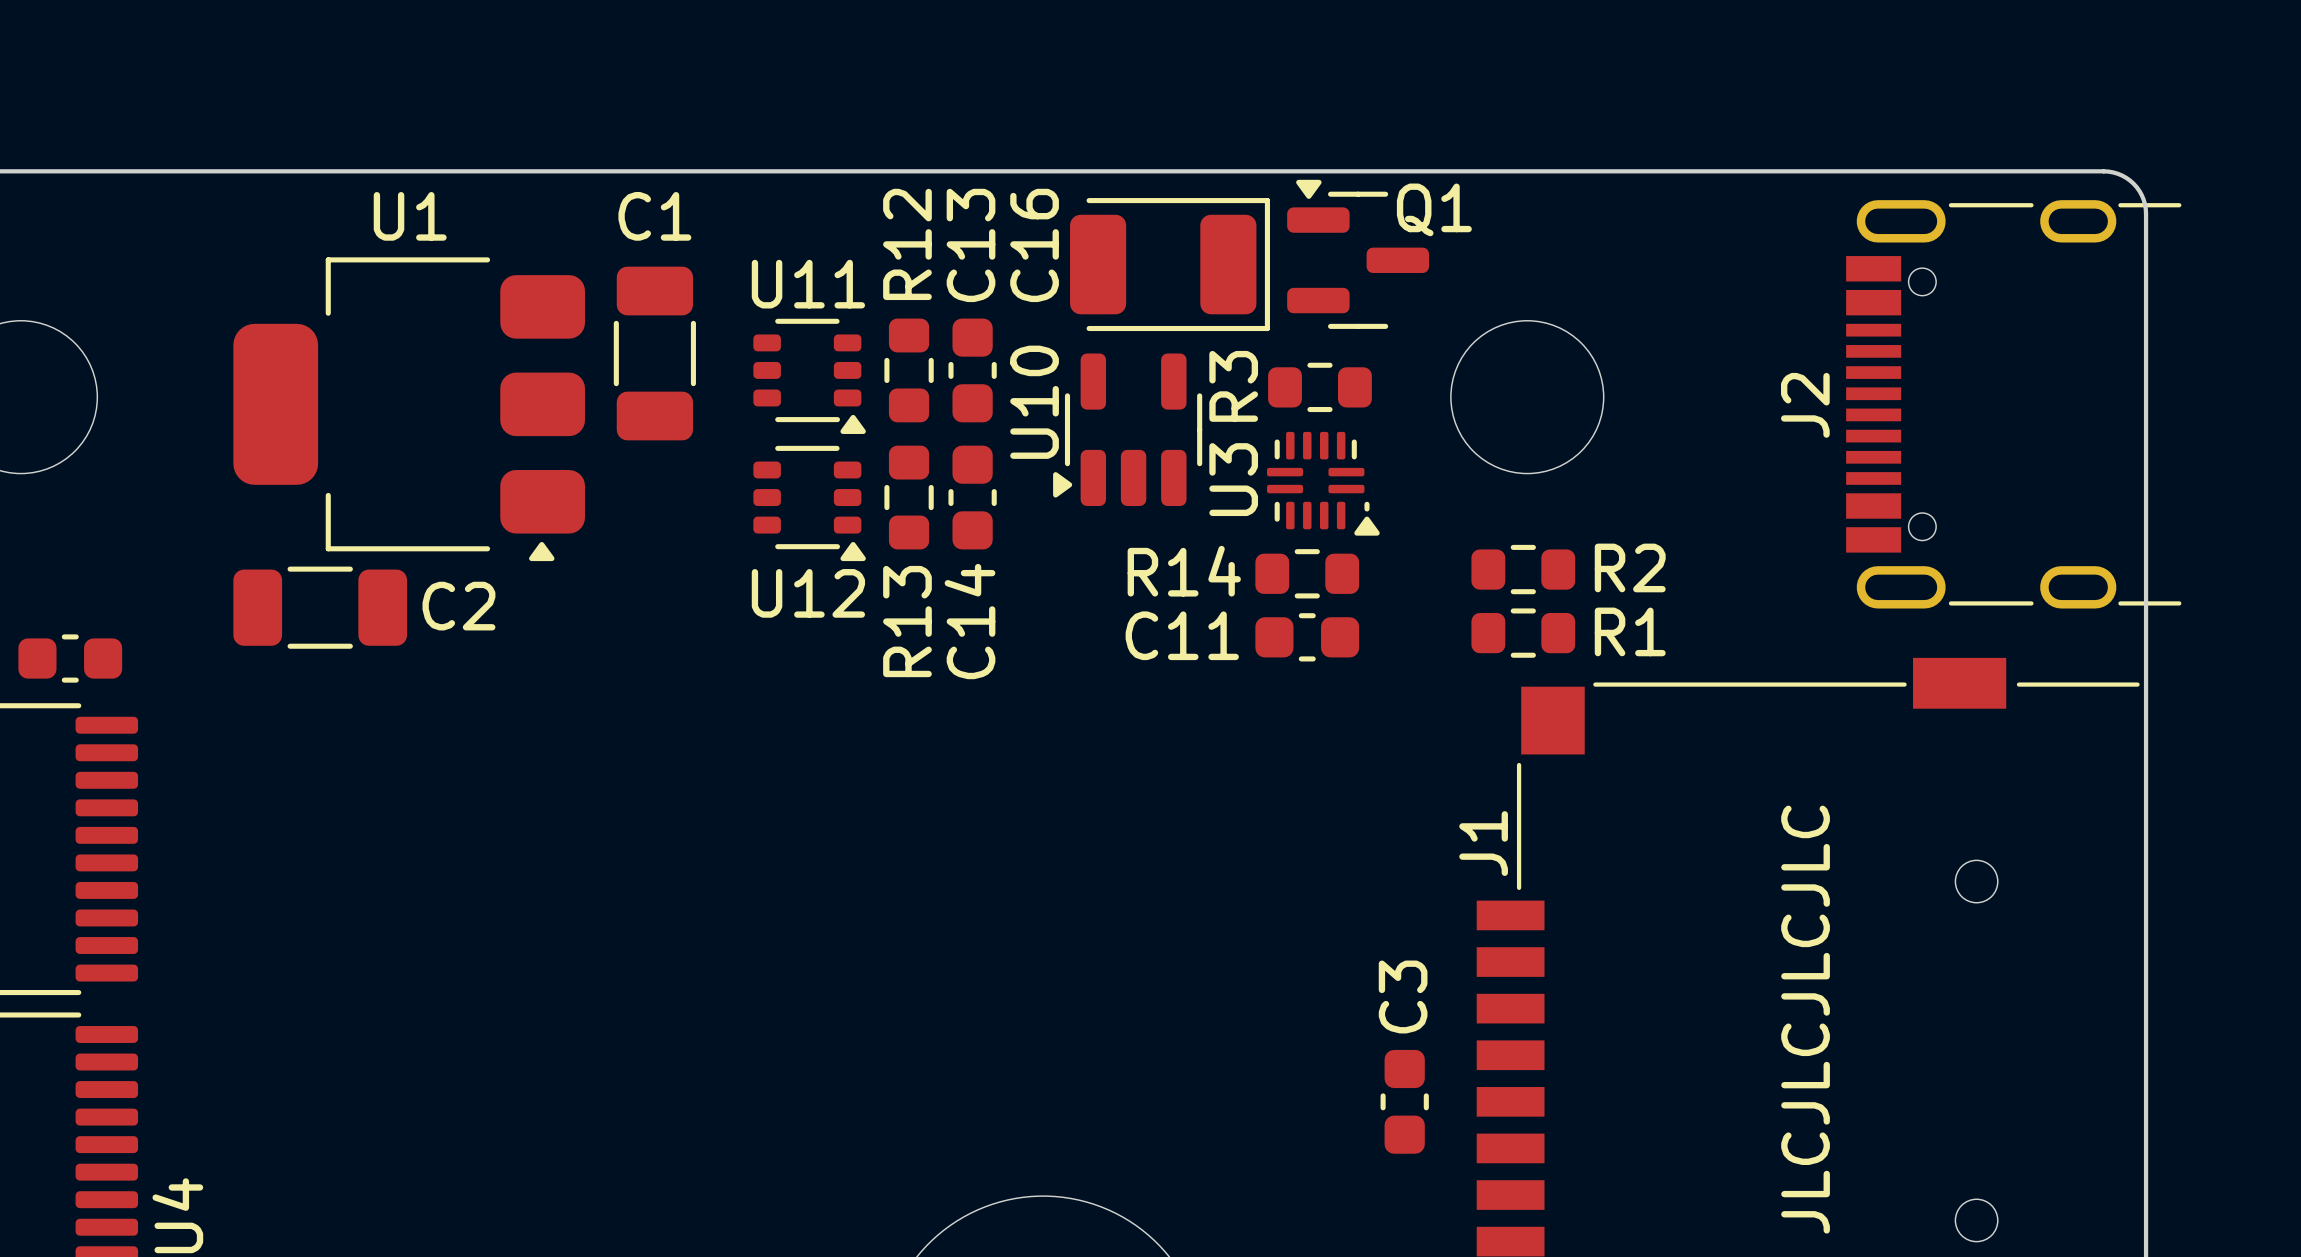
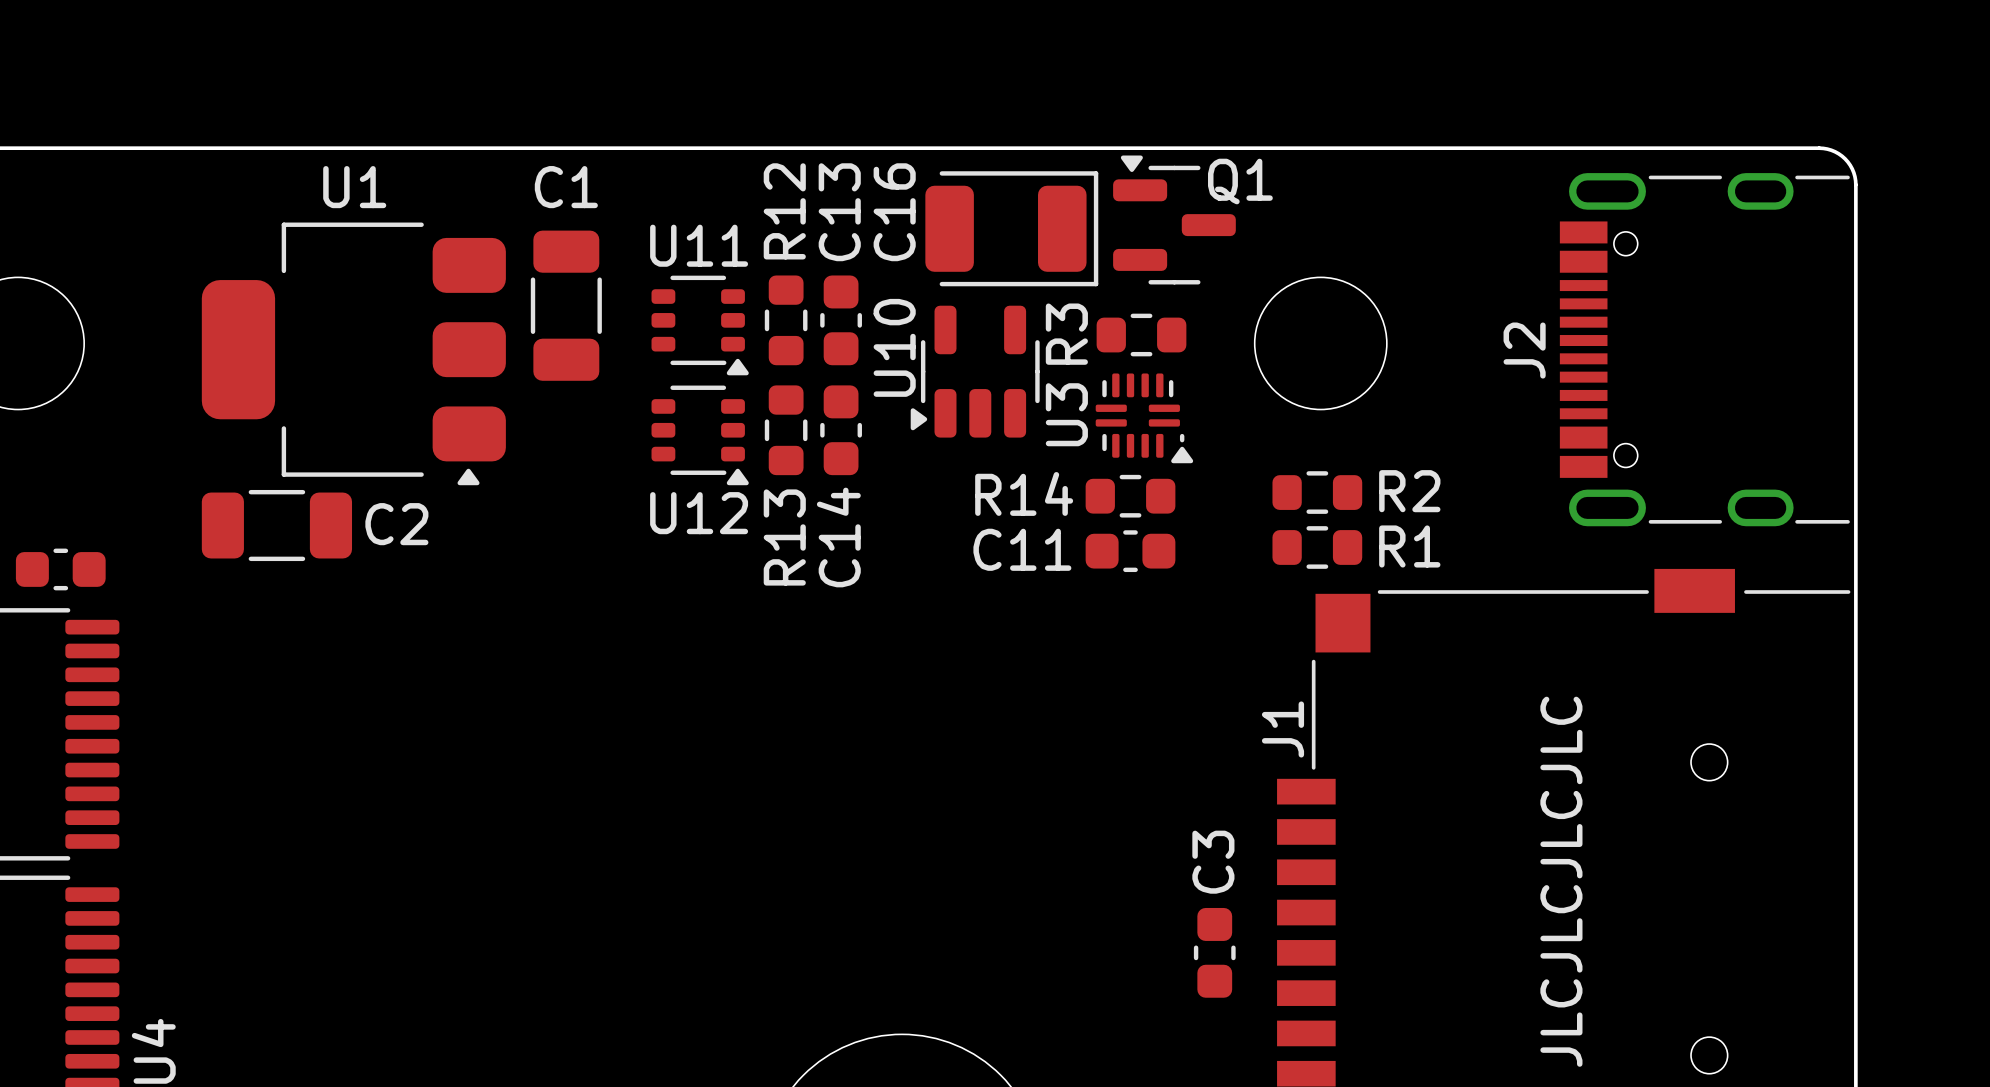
J2 position: (2013, 404) -> (1704, 349)

